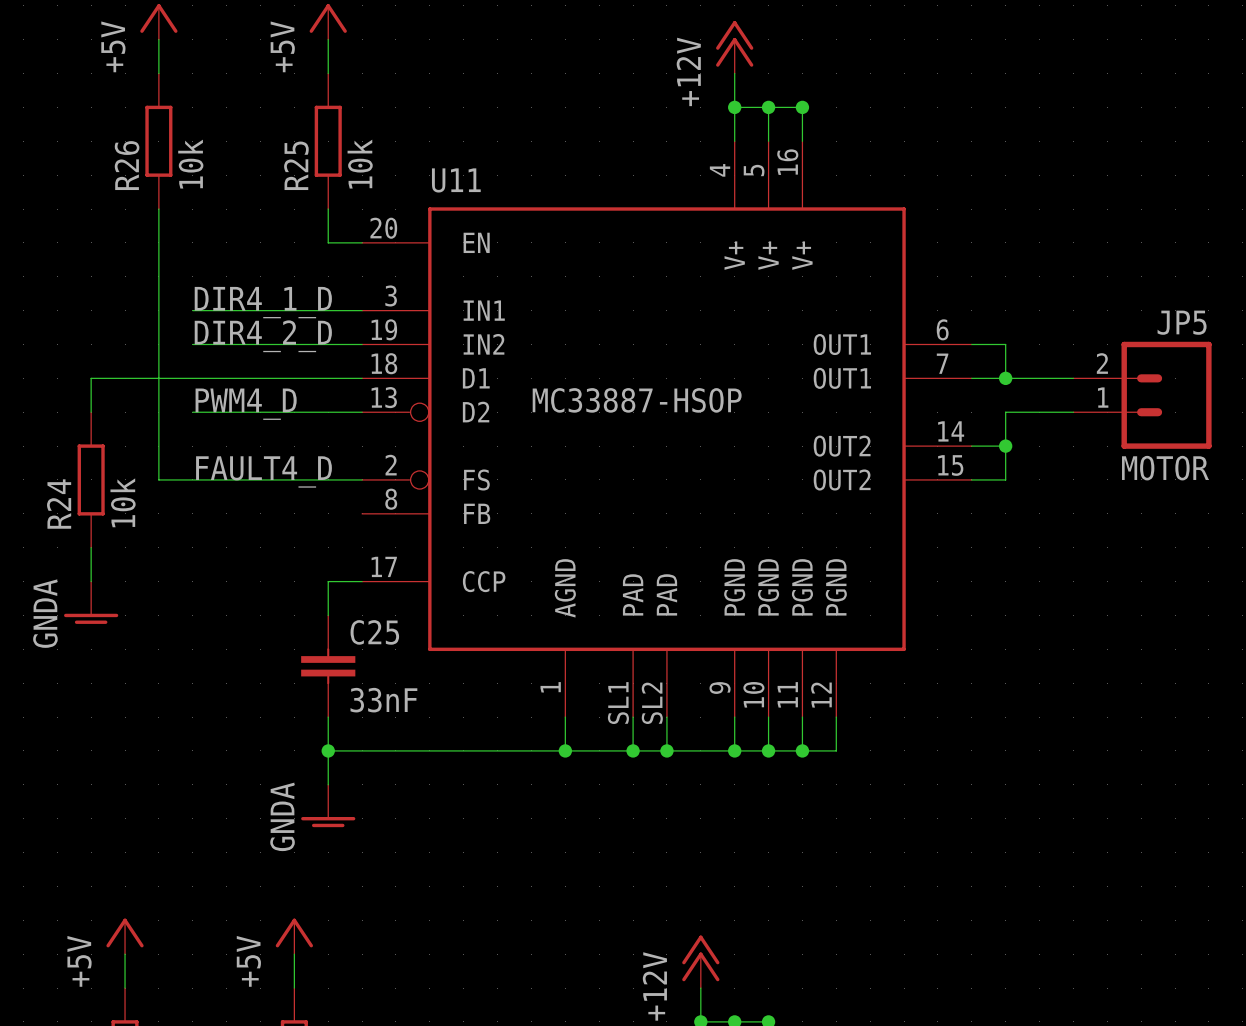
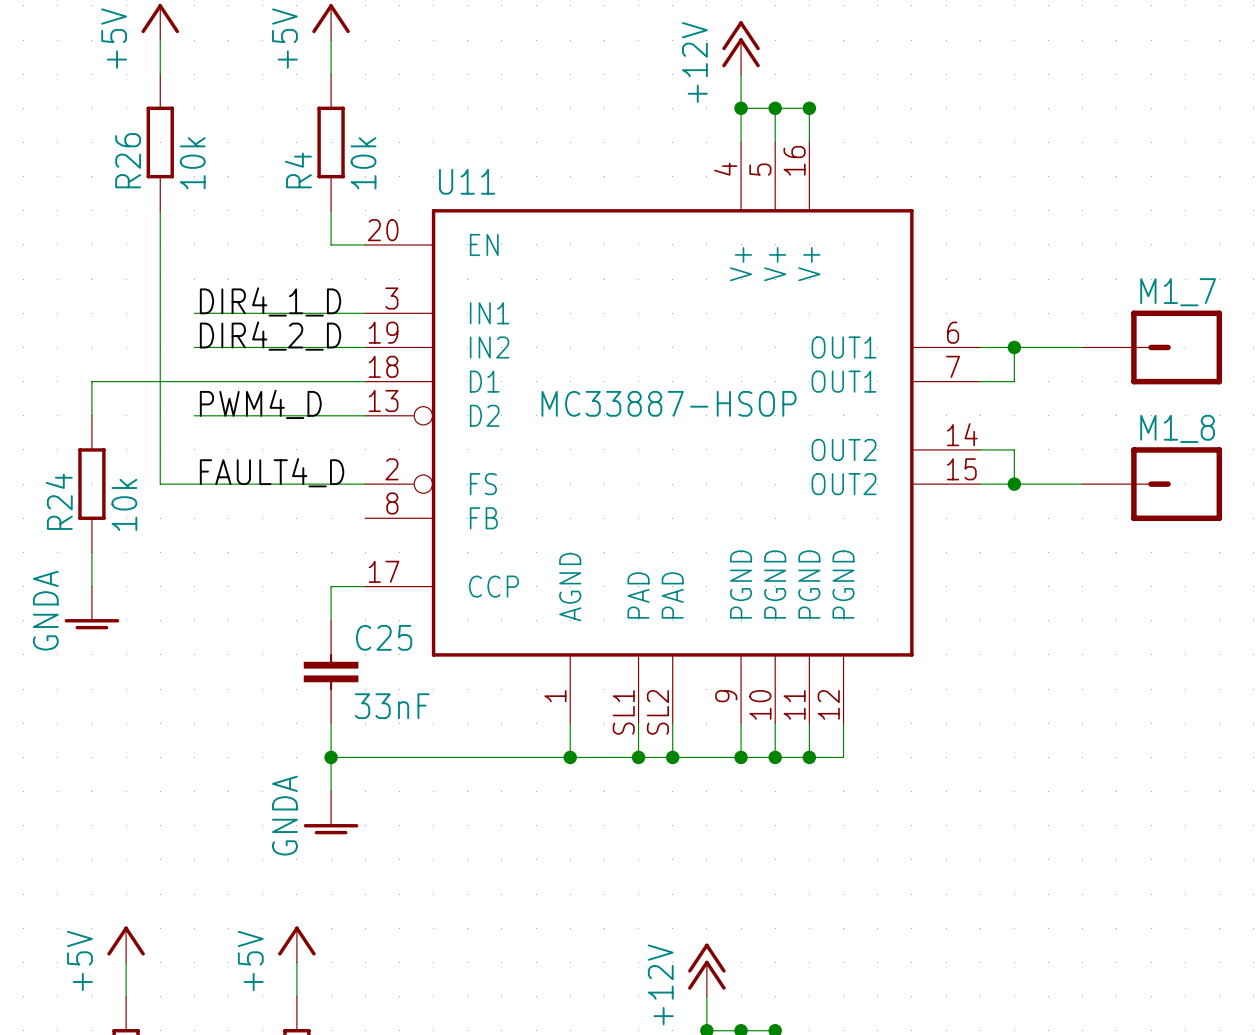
R25 name: R25 (296, 165) -> R4 (298, 170)
M1_7: none -> (1152, 347)
wire: (1005, 378) (1073, 378) -> (1014, 347) (1082, 347)
junction position: (1005, 378) -> (1014, 347)
JP5: MOTOR (1142, 395) -> none
wire: (1073, 412) (1005, 412) (1005, 446) -> none
junction position: (1005, 446) -> (1014, 484)
wire: none -> (1014, 484) (1082, 484)
M1_8: none -> (1152, 484)

